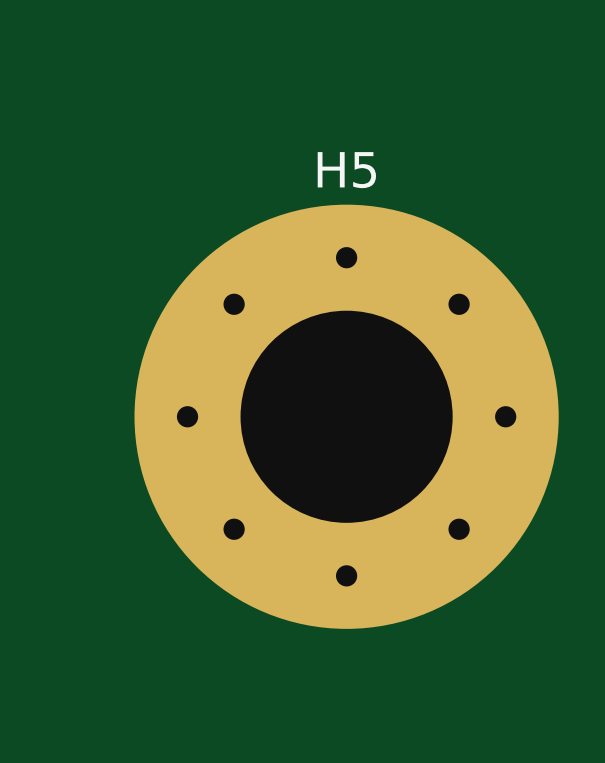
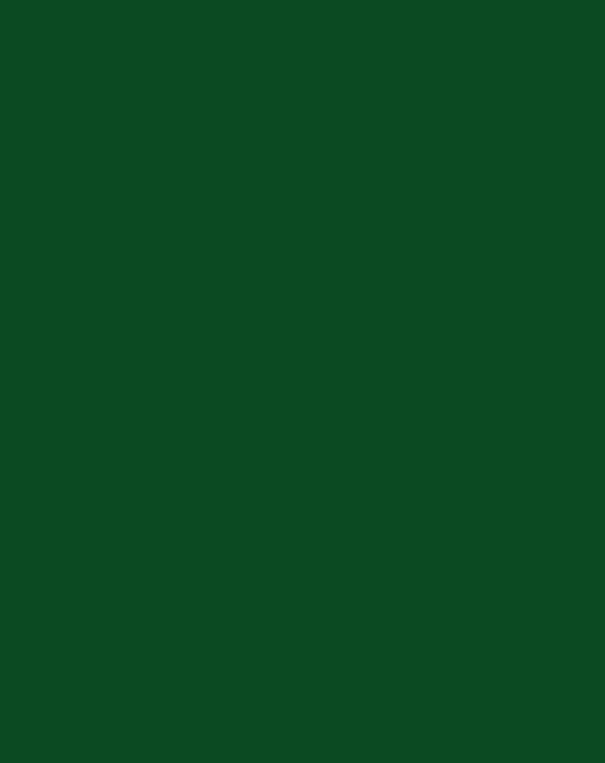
H5: (346, 416) -> none

